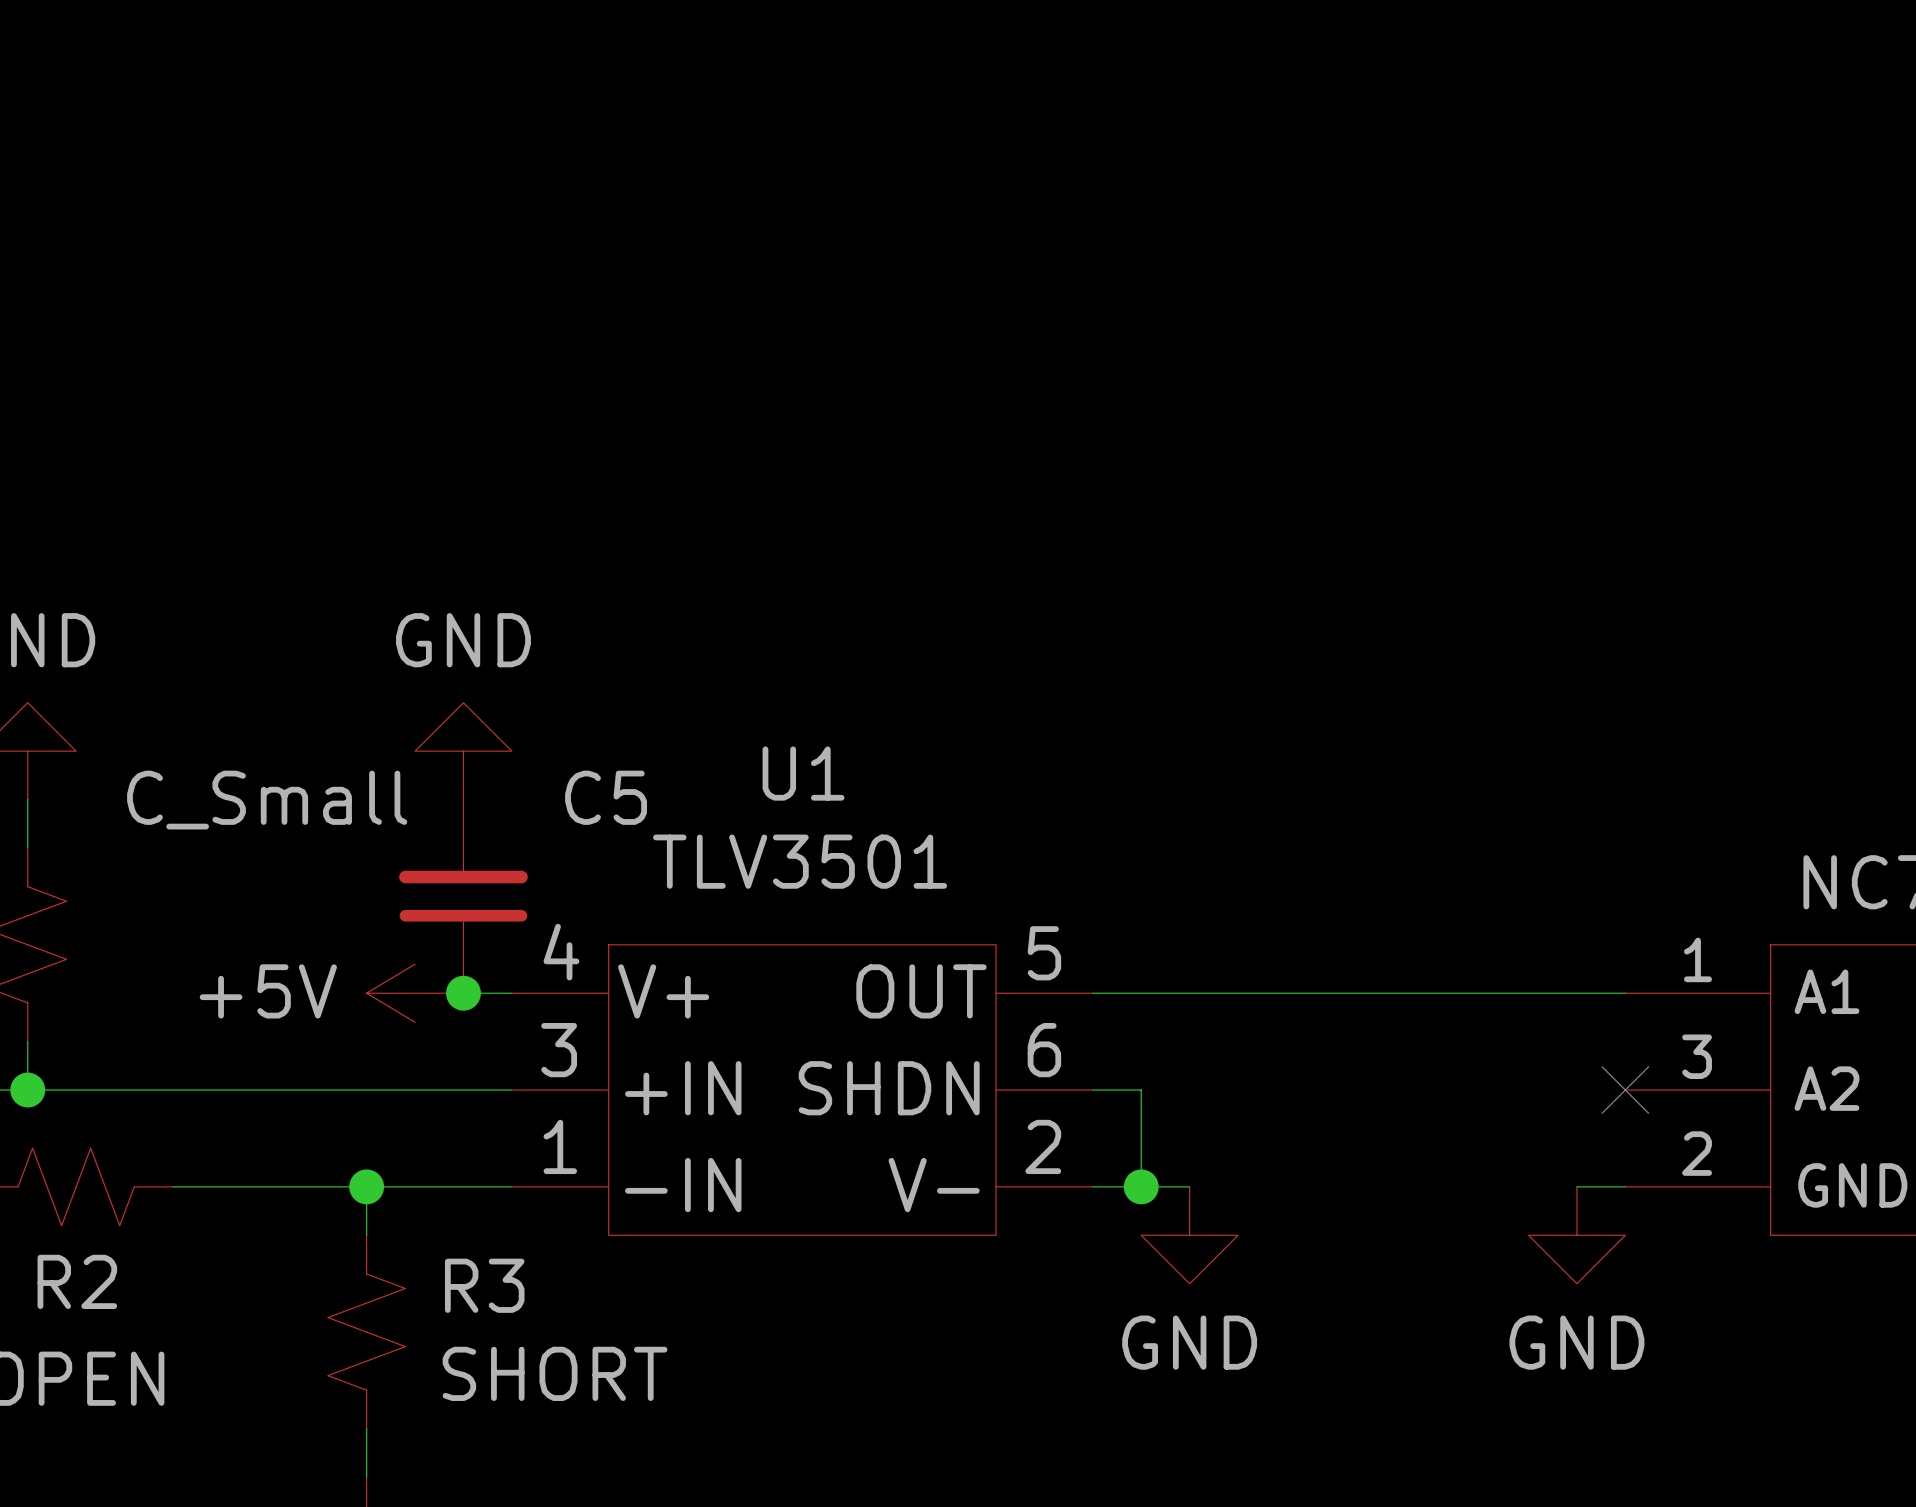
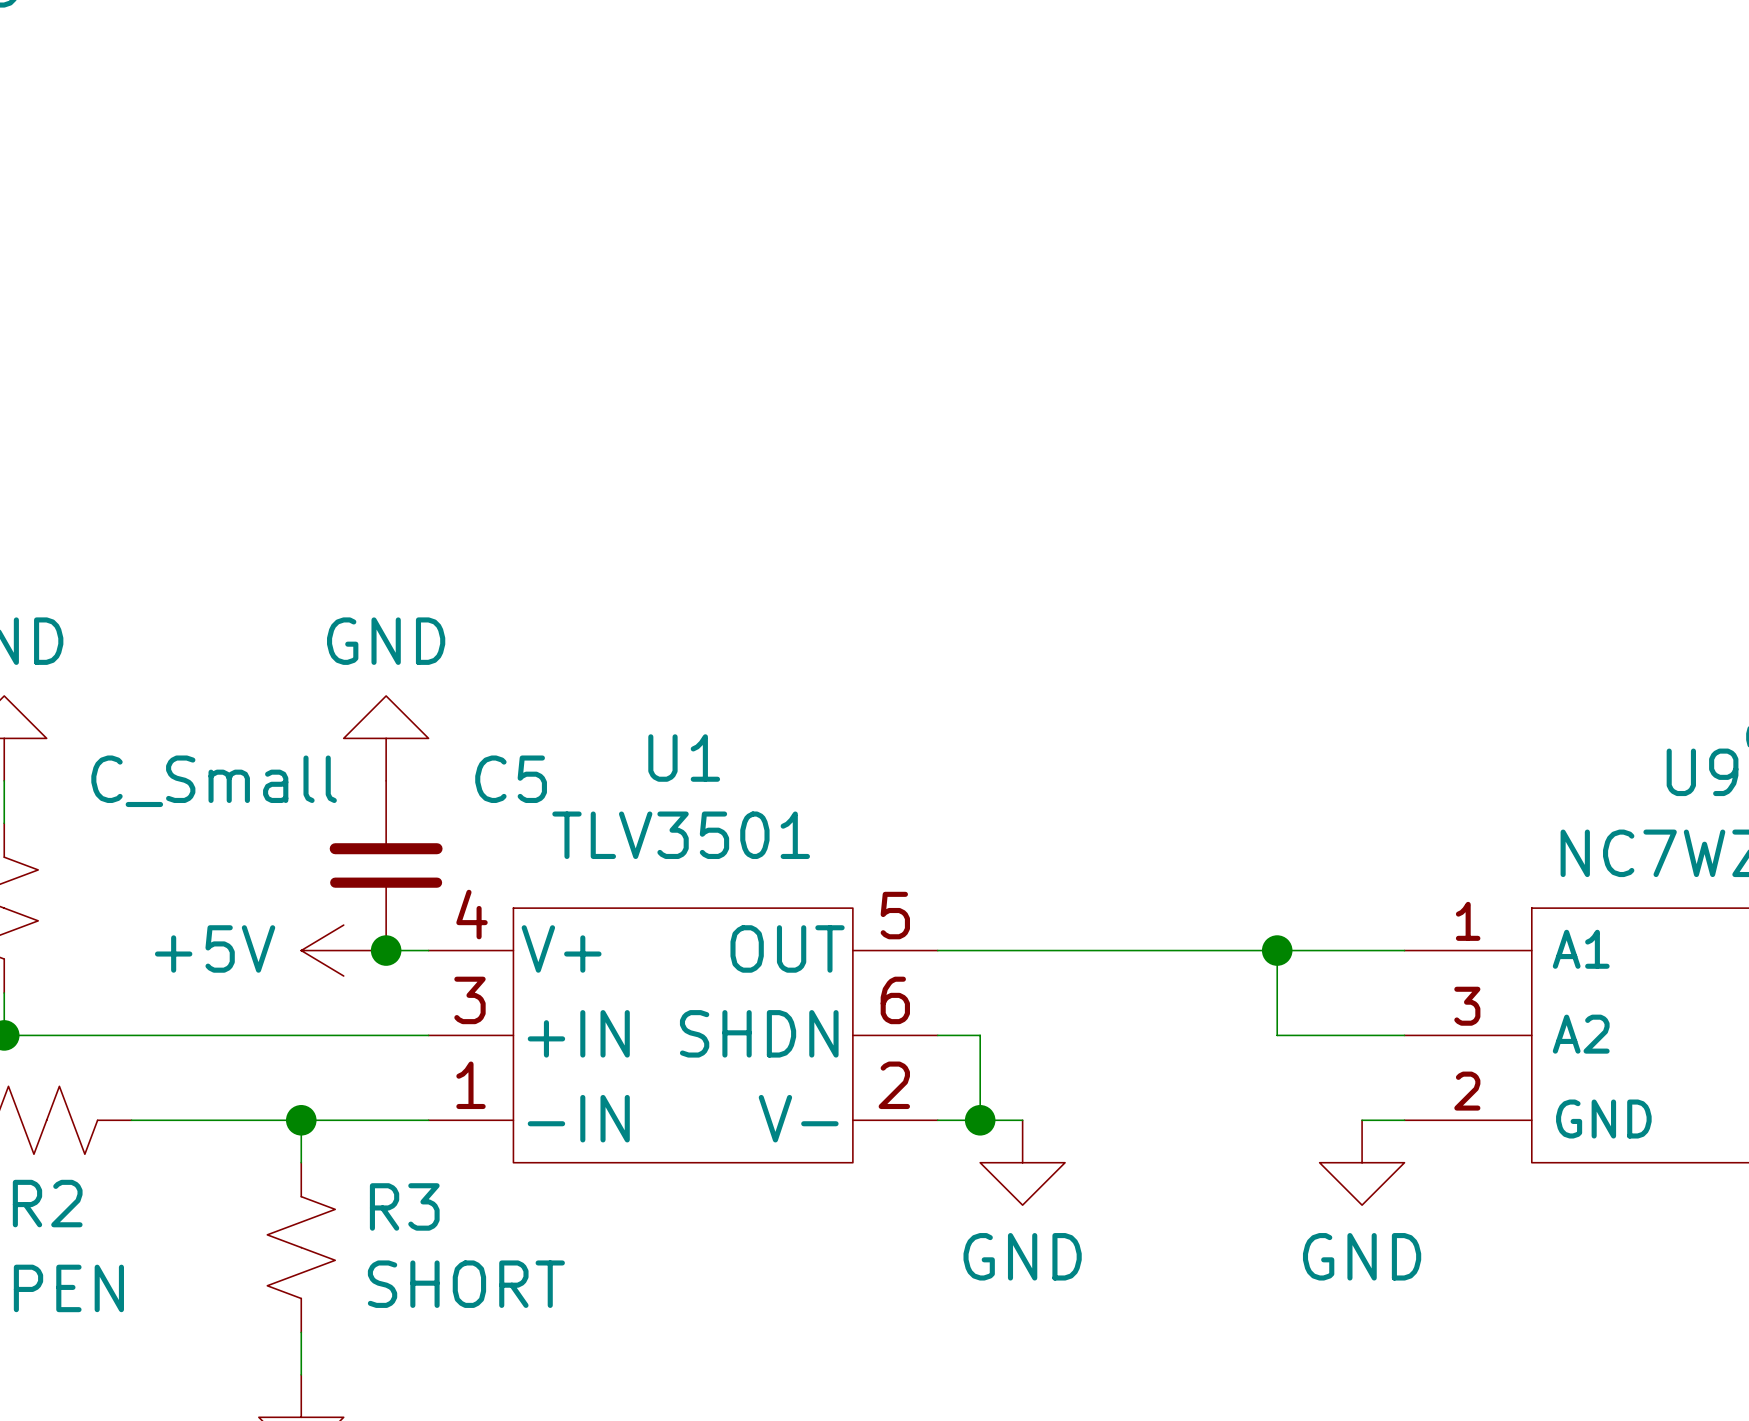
wire: none -> (1277, 950) (1277, 1035) (1404, 1035)
junction: none -> (1277, 950)
no-connect mark: (1625, 1090) -> none

